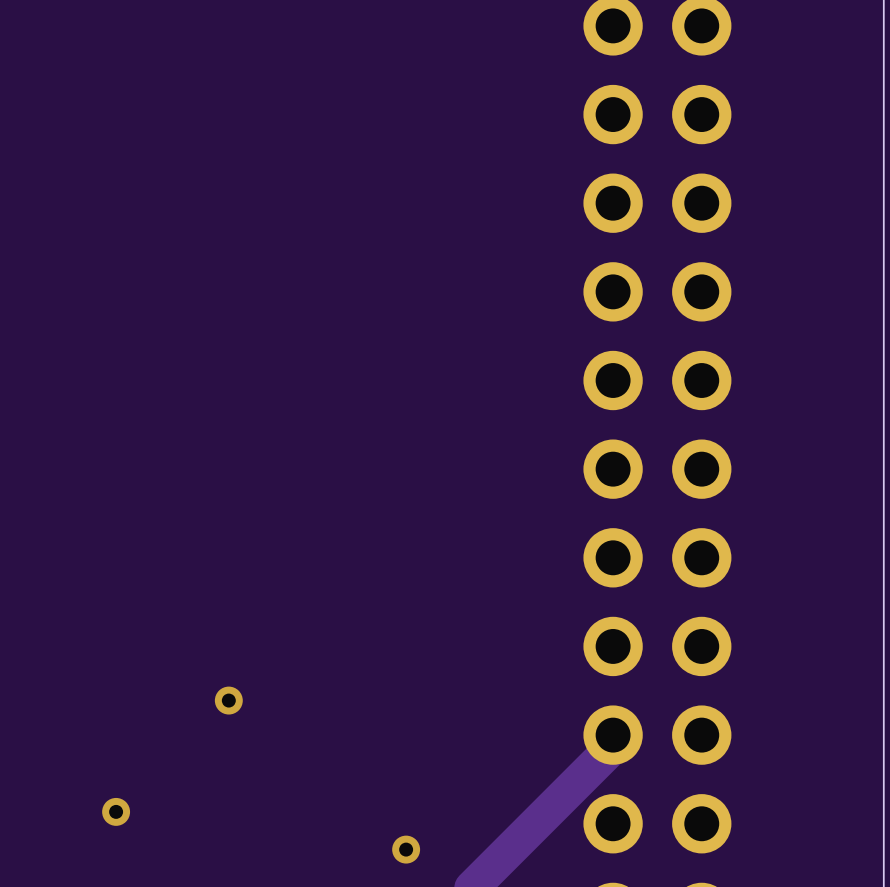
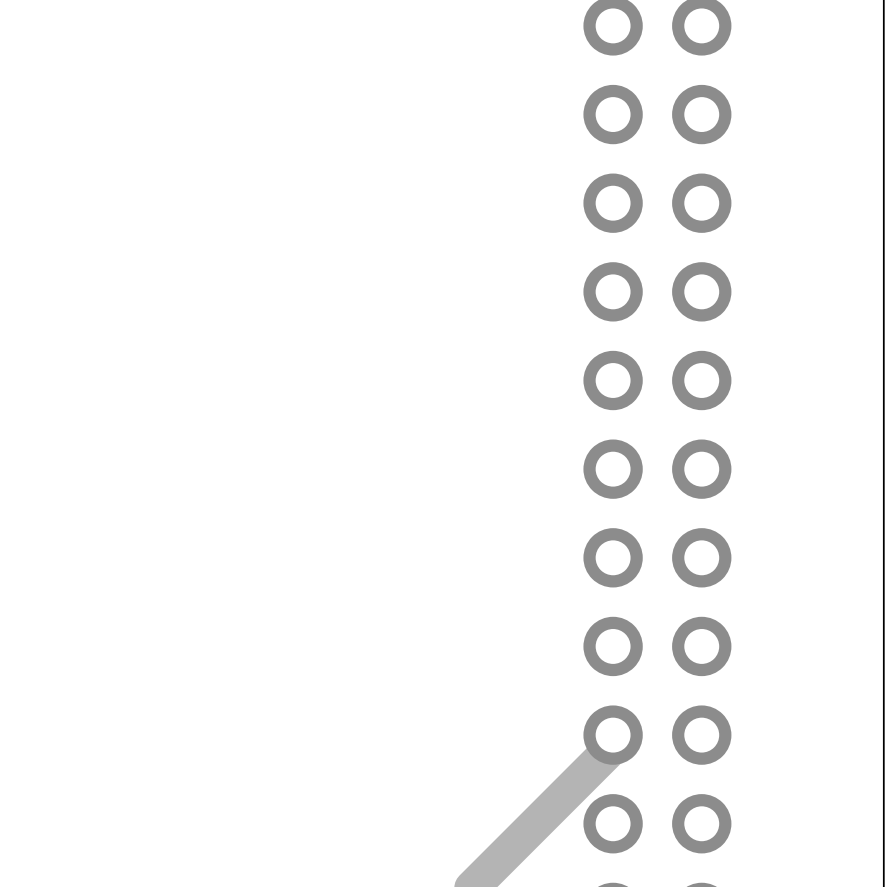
via: (228, 700) -> none
via: (116, 811) -> none
via: (406, 849) -> none

